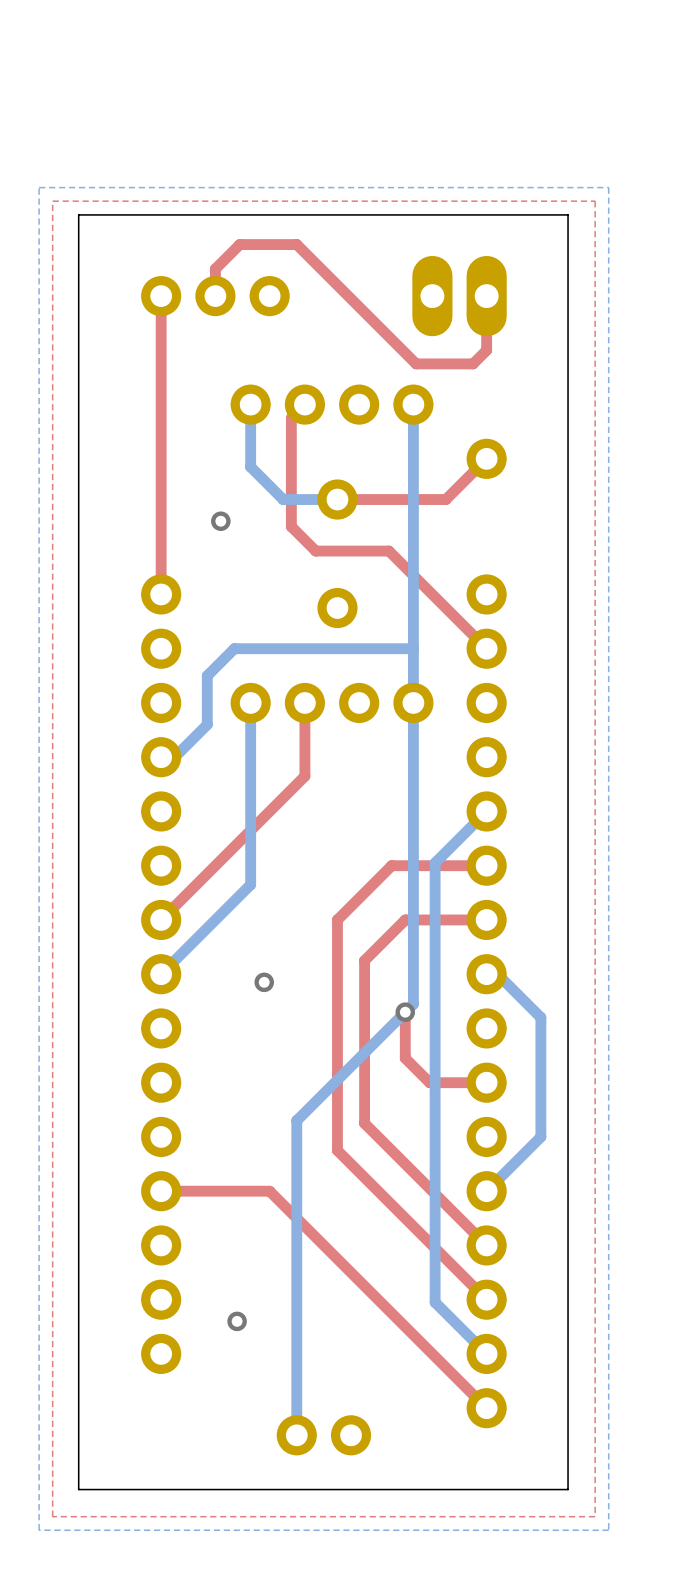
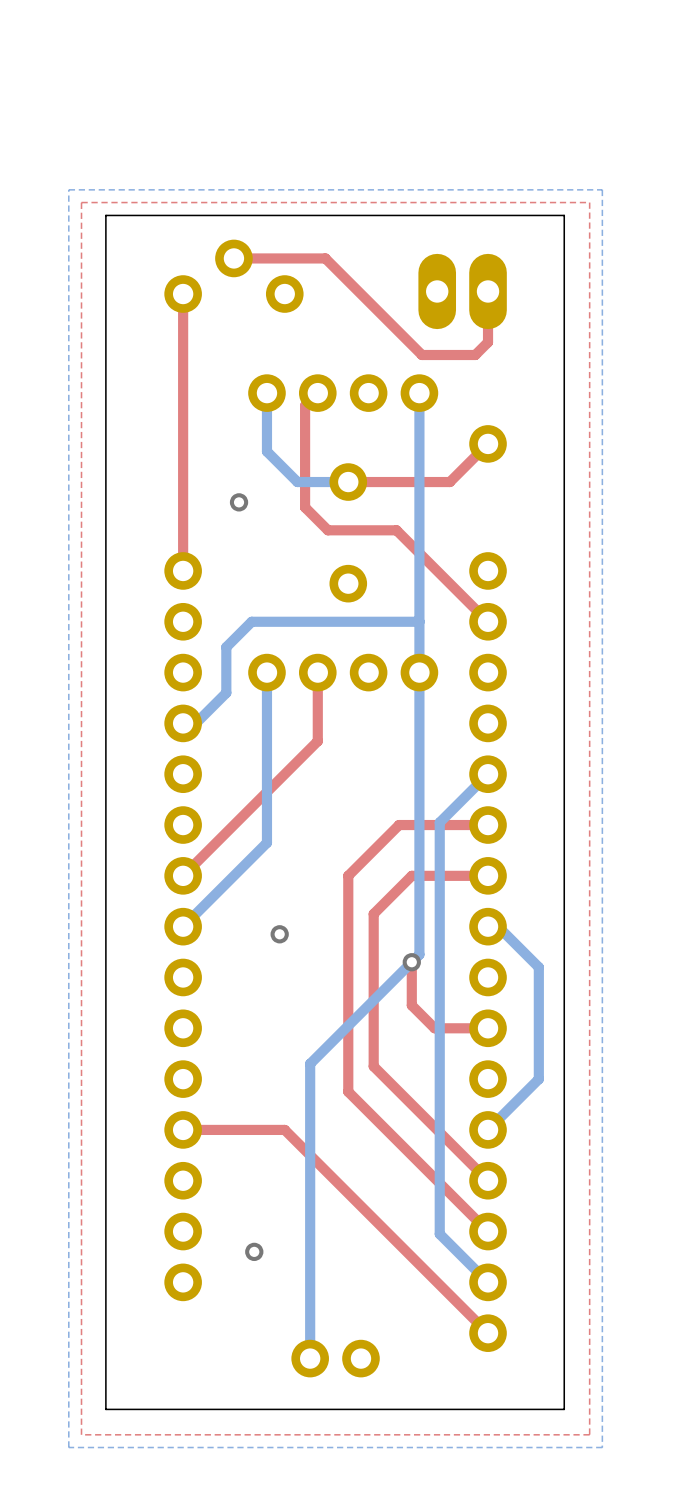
part: none -> (233, 258)
top track: (313, 260) (296, 244) (239, 244) (215, 268) (215, 296) -> (325, 258) (233, 258)
part: (215, 296) -> none
part: none -> (183, 294)
part: none -> (284, 294)

